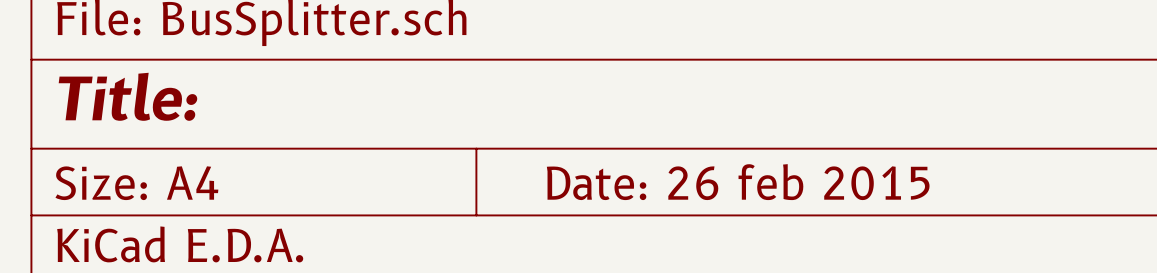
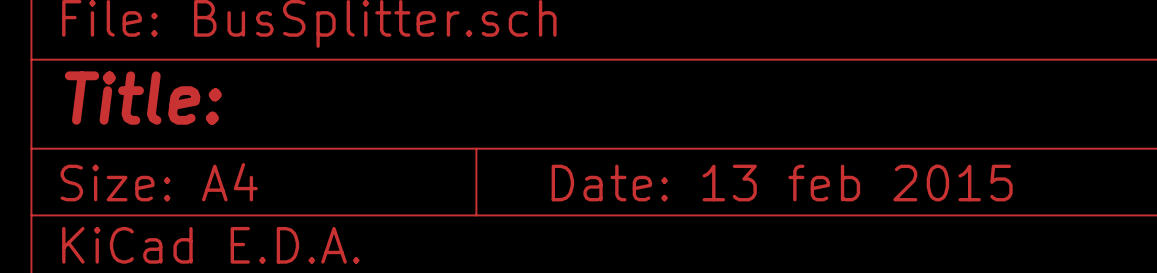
title block: Date: 26 feb 2015 (738, 182) -> Date: 13 feb 2015 (782, 183)

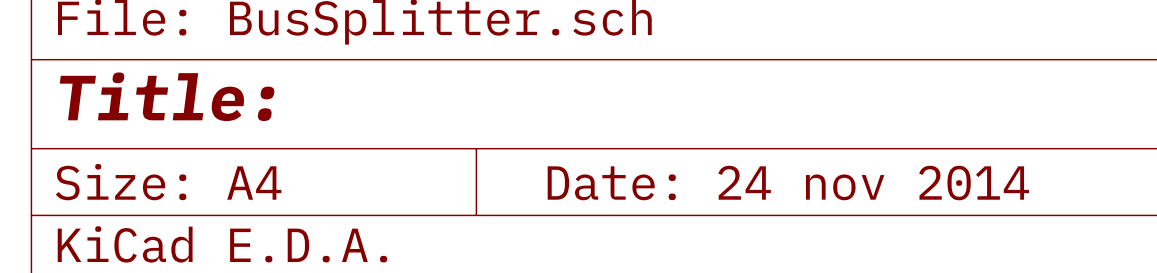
title block: Date: 13 feb 2015 (782, 183) -> Date: 24 nov 2014 (788, 183)

